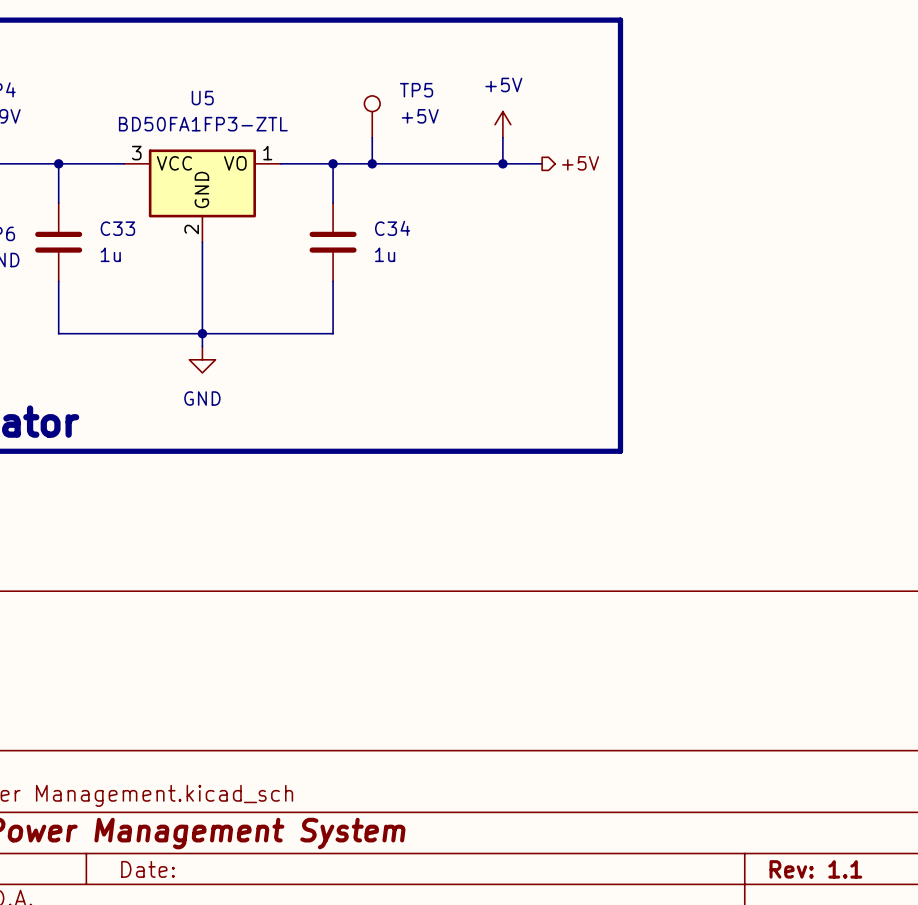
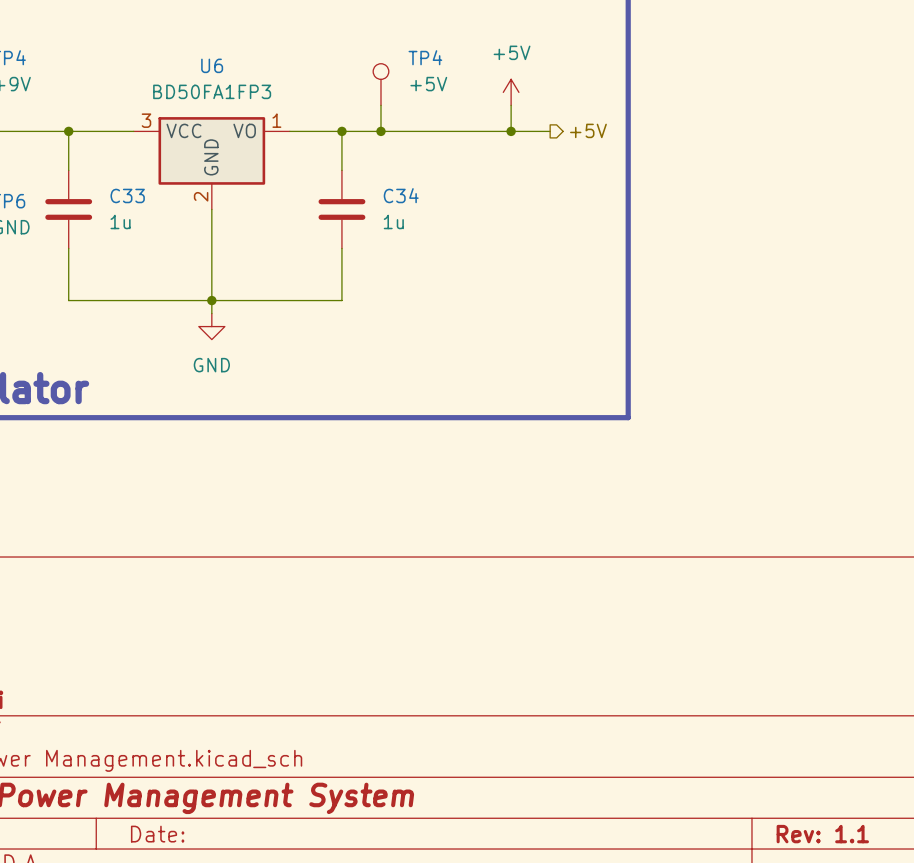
TP5 name: TP5 (416, 90) -> TP4 (425, 57)
U5 name: U5 (202, 98) -> U6 (212, 65)
U5 value: BD50FA1FP3-ZTL (203, 124) -> BD50FA1FP3 (212, 91)

